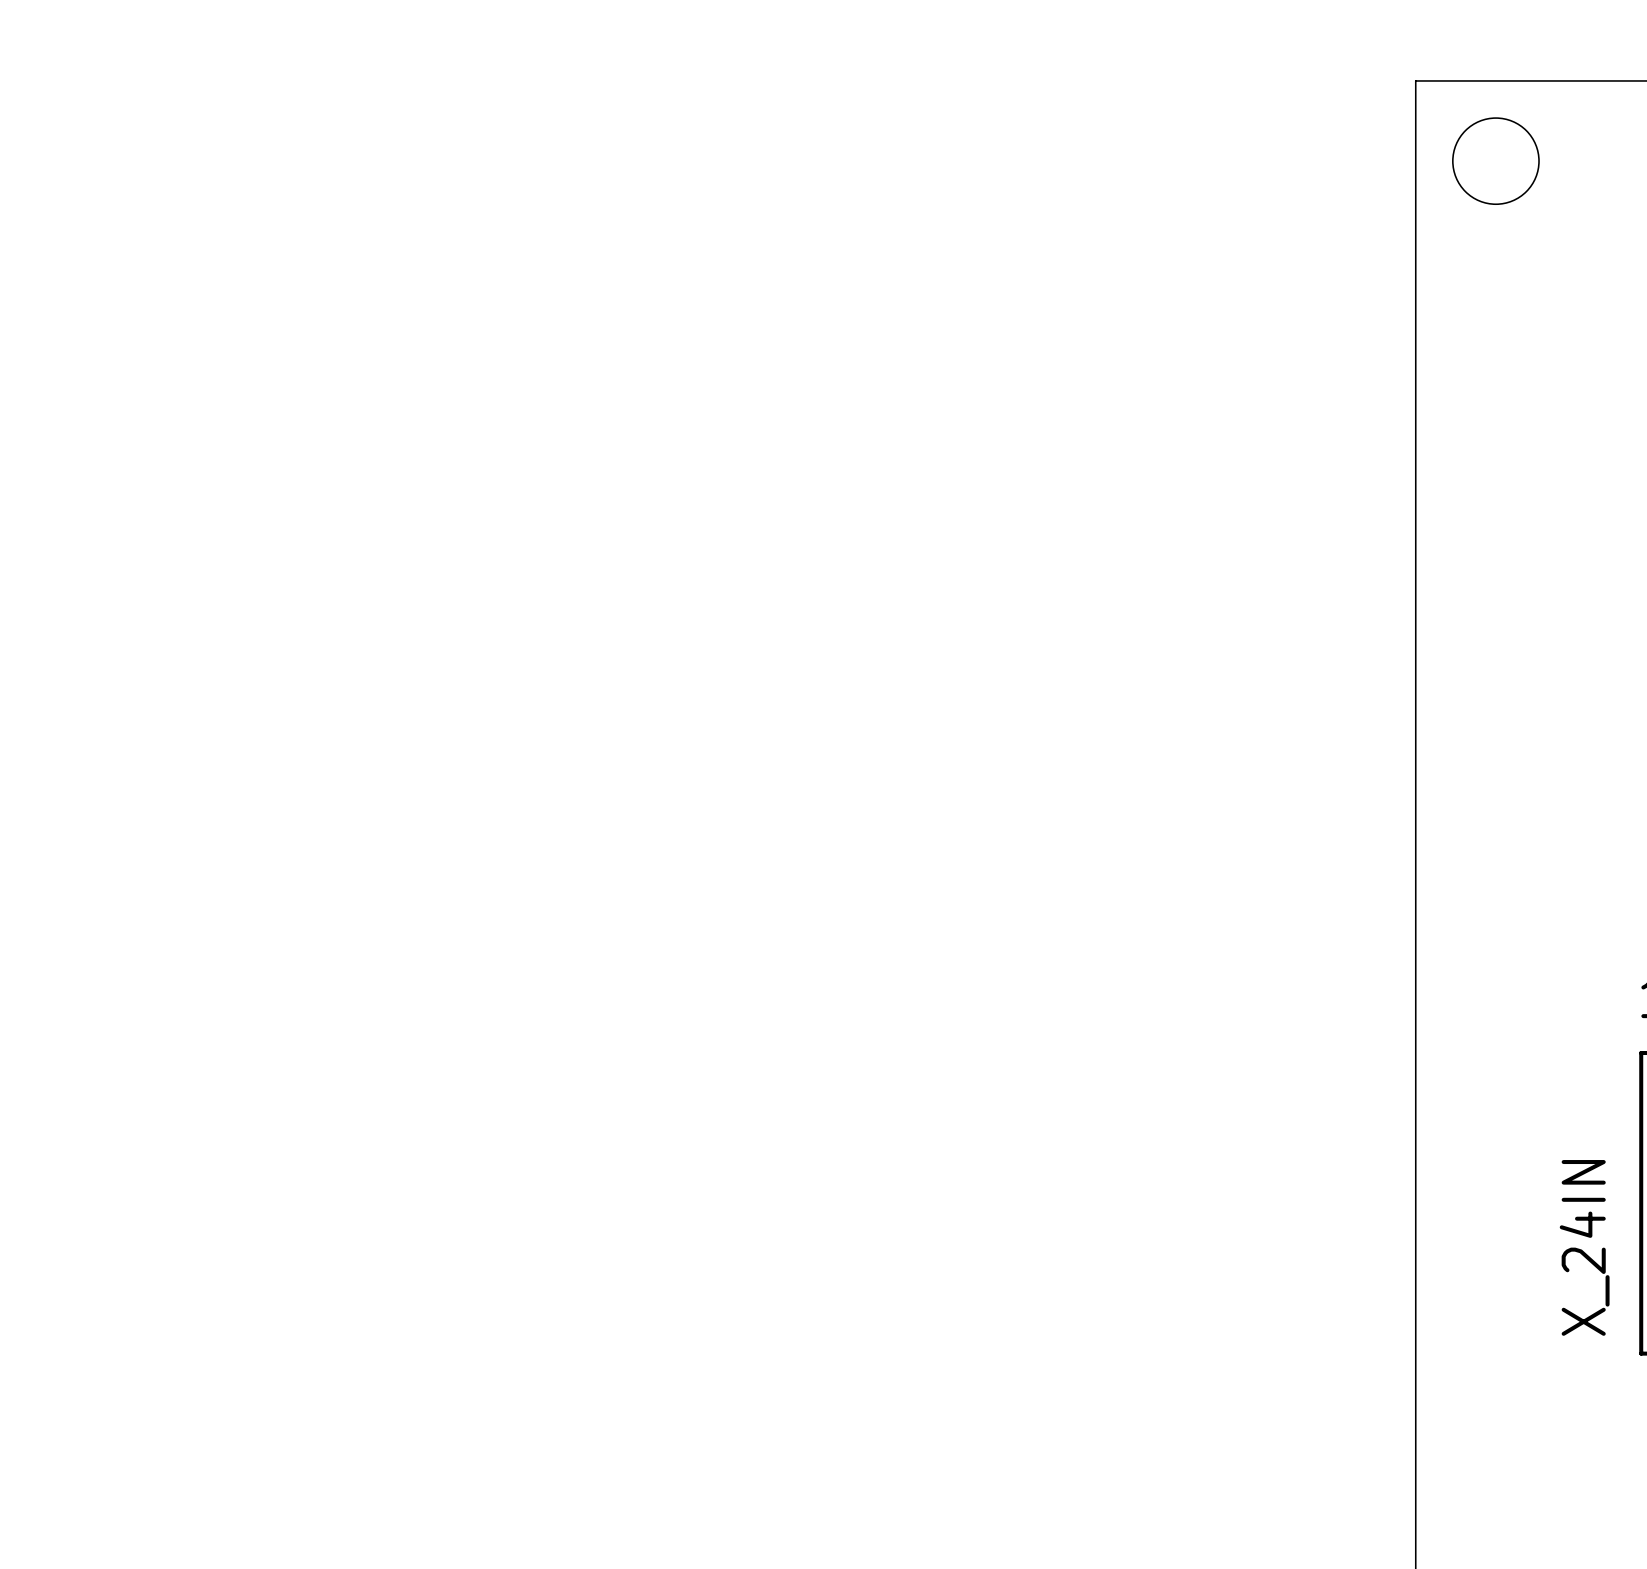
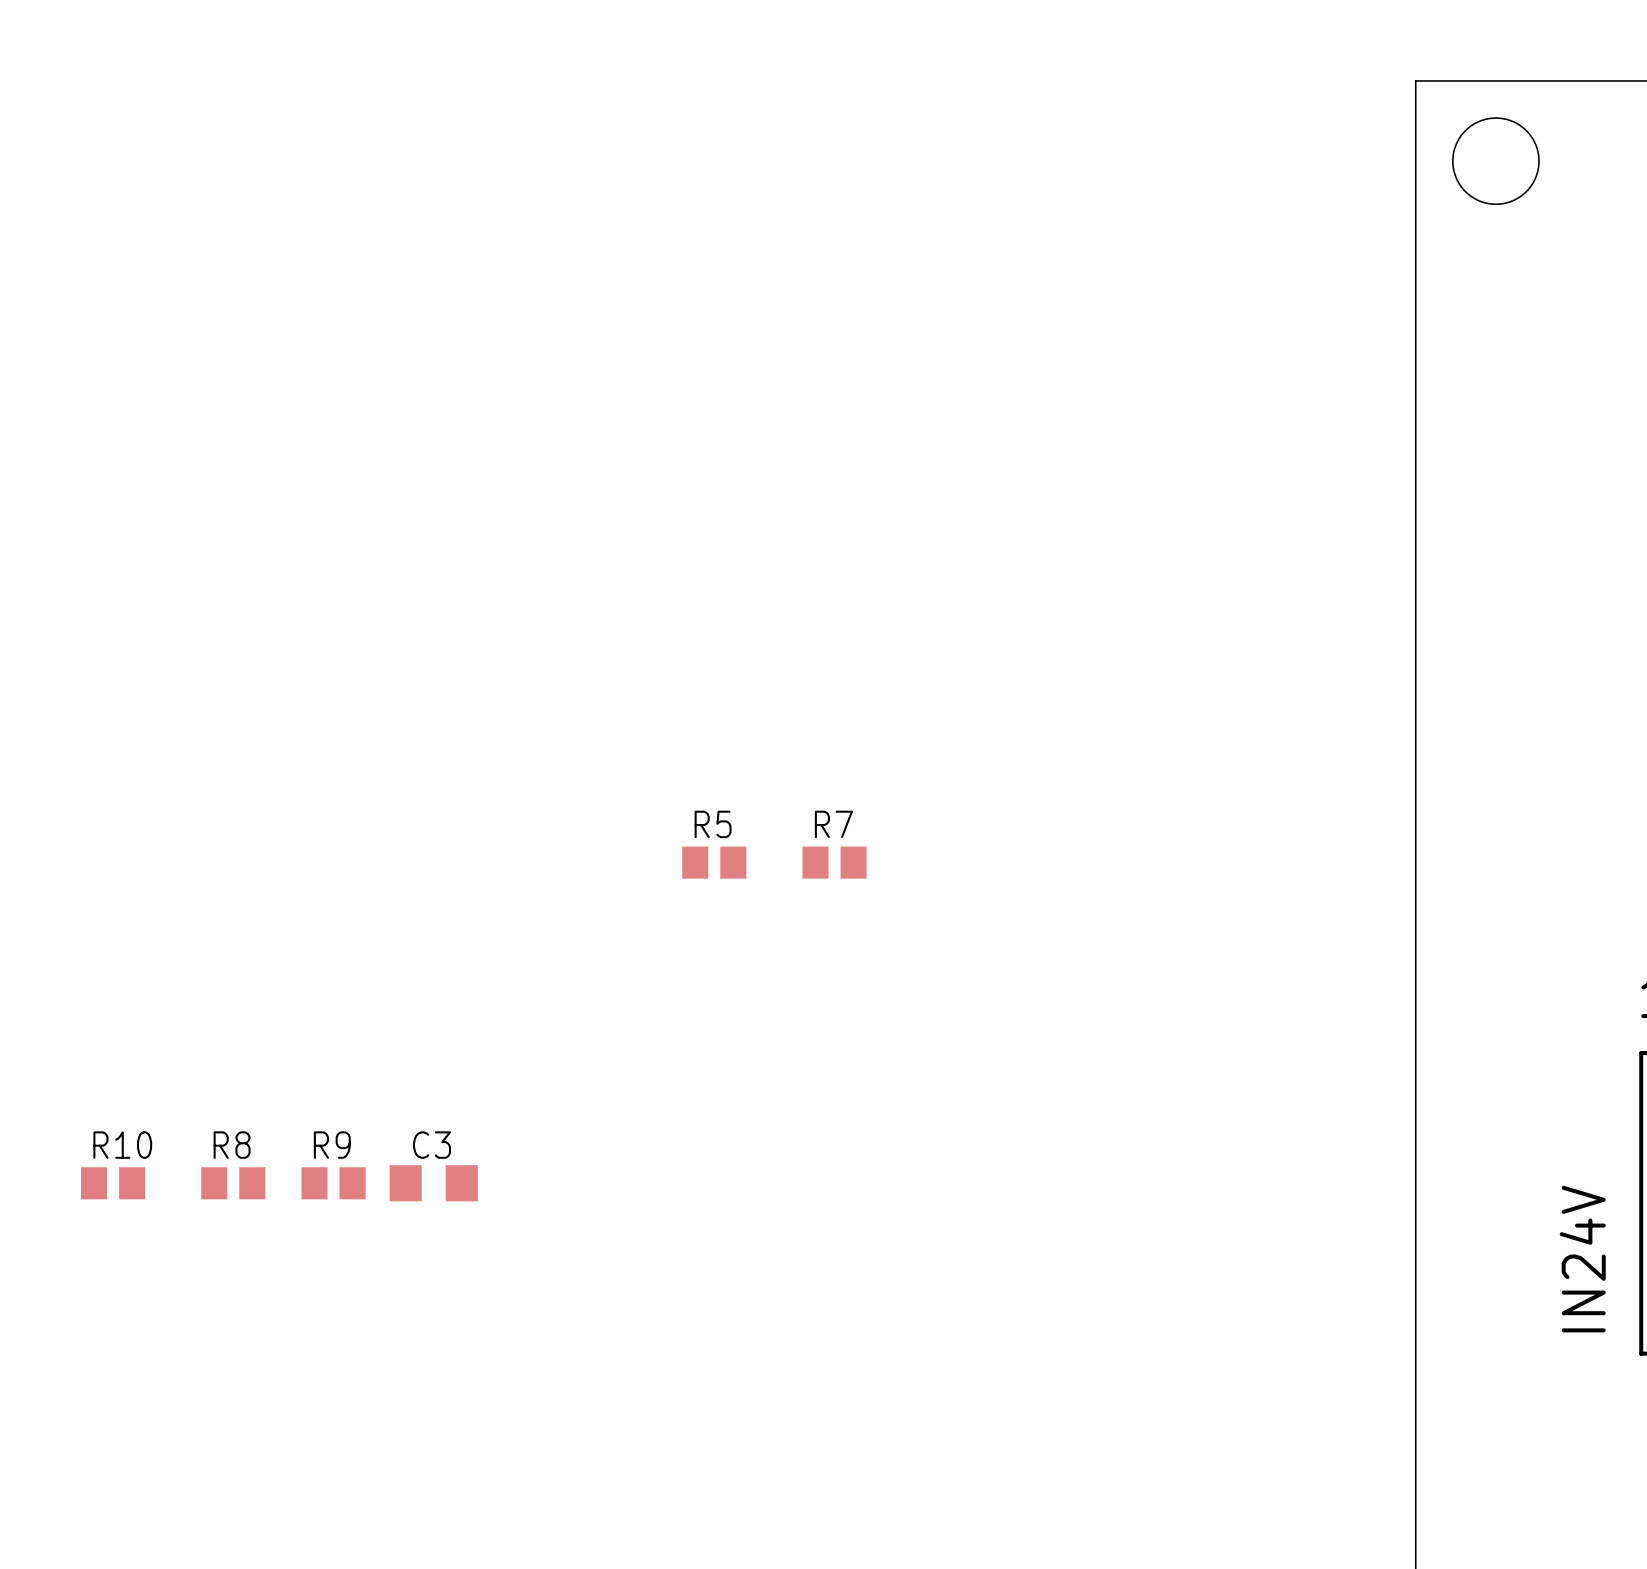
R5: none -> (714, 862)
R7: none -> (834, 862)
R10: none -> (113, 1183)
R8: none -> (233, 1183)
R9: none -> (333, 1183)
C3: none -> (433, 1183)
X_24IN name: X_24IN (1584, 1247) -> IN24V (1582, 1259)

